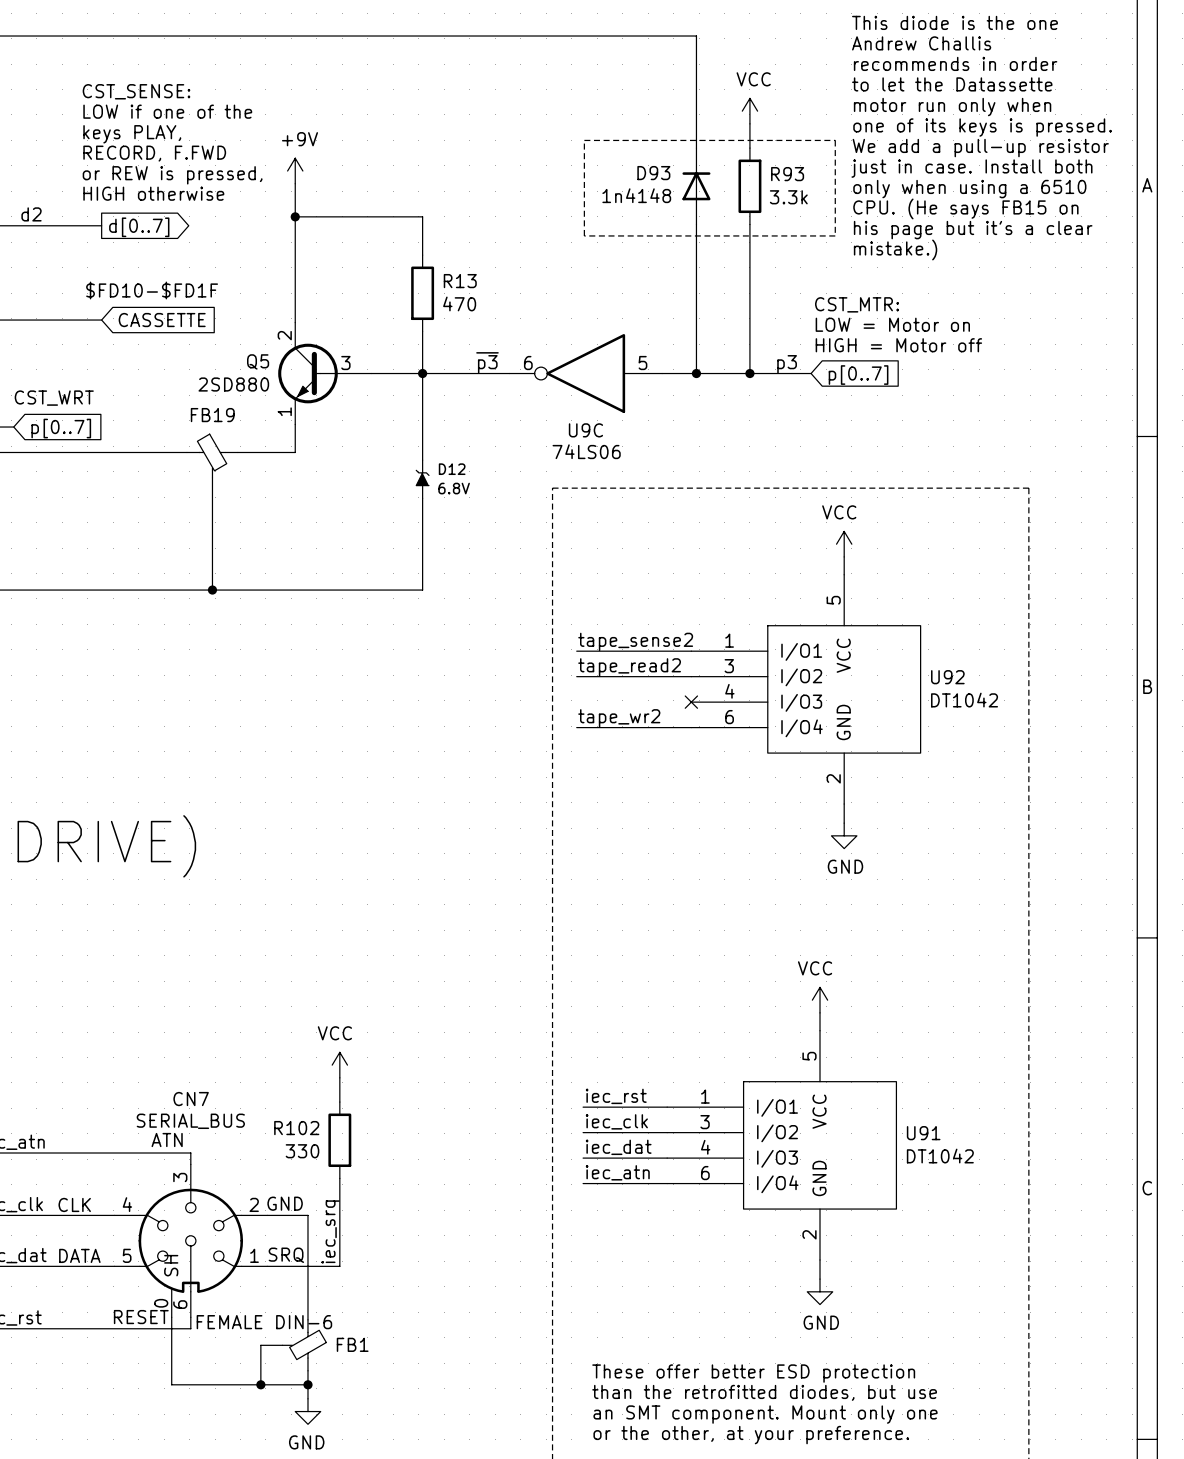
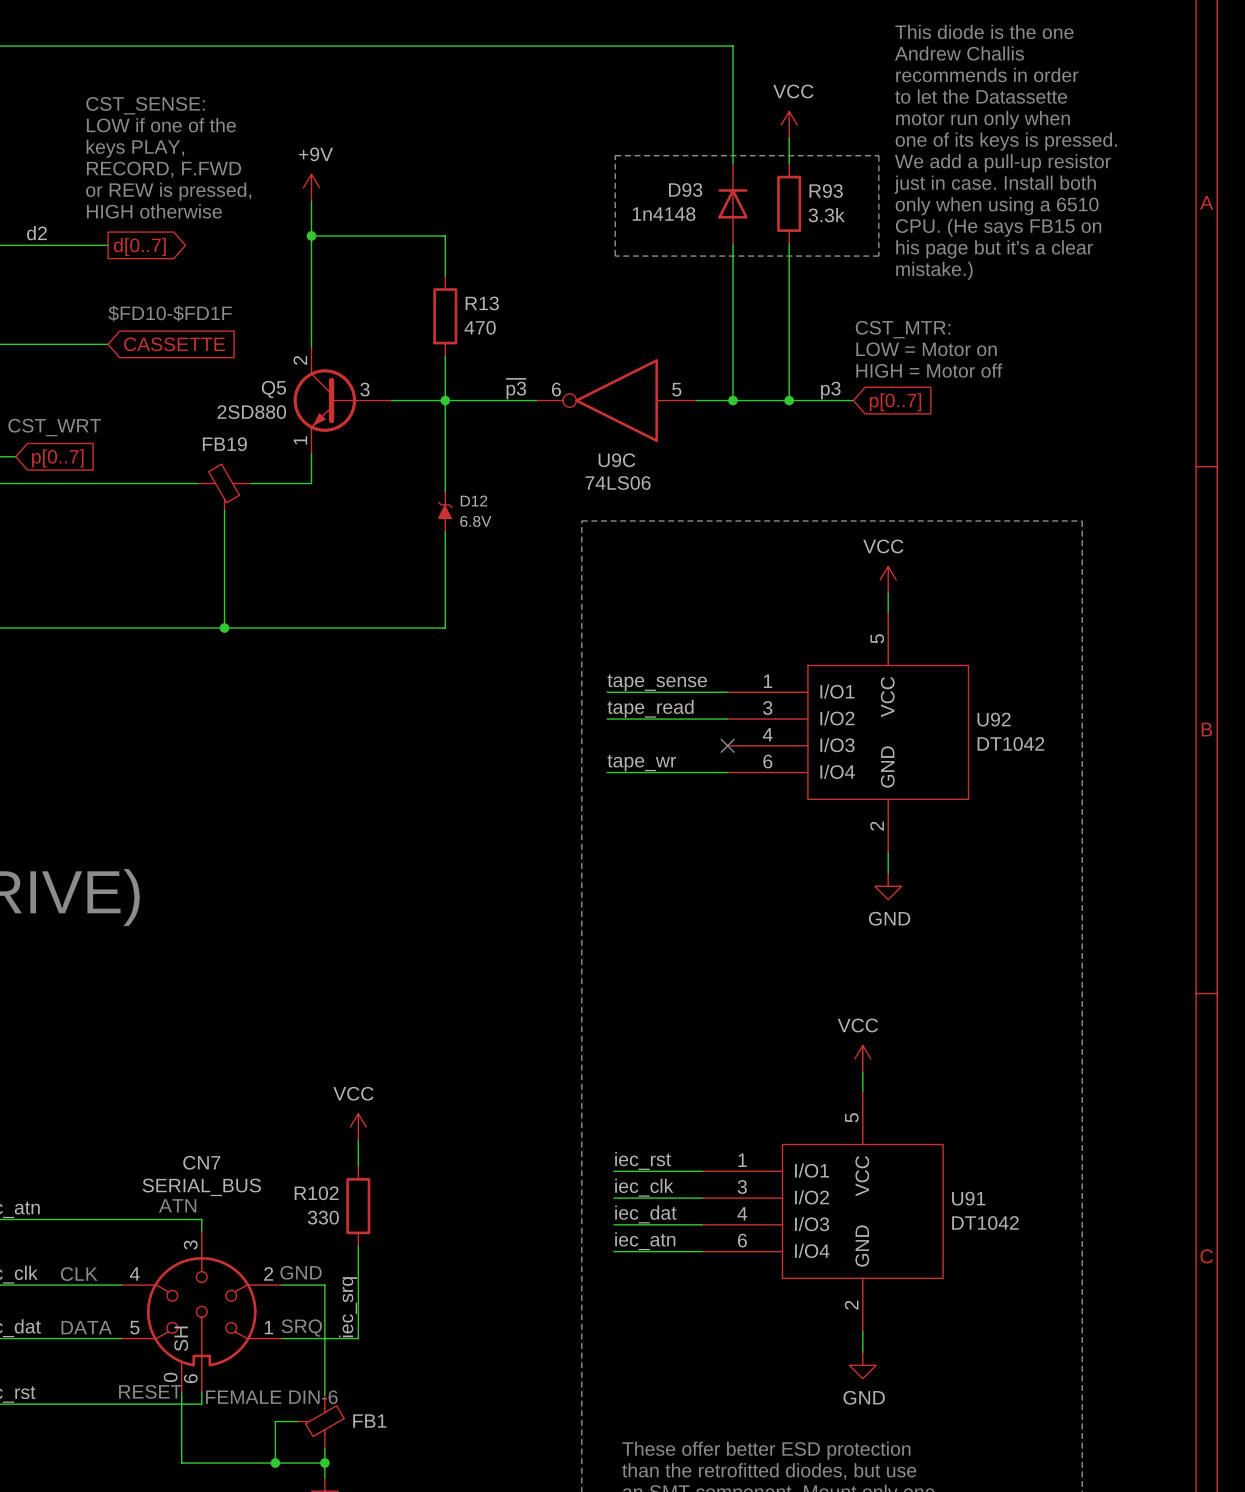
label: tape_sense2 (635, 641) -> tape_sense (657, 682)
label: tape_read2 (629, 667) -> tape_read (650, 708)
label: tape_wr2 (619, 718) -> tape_wr (641, 763)

